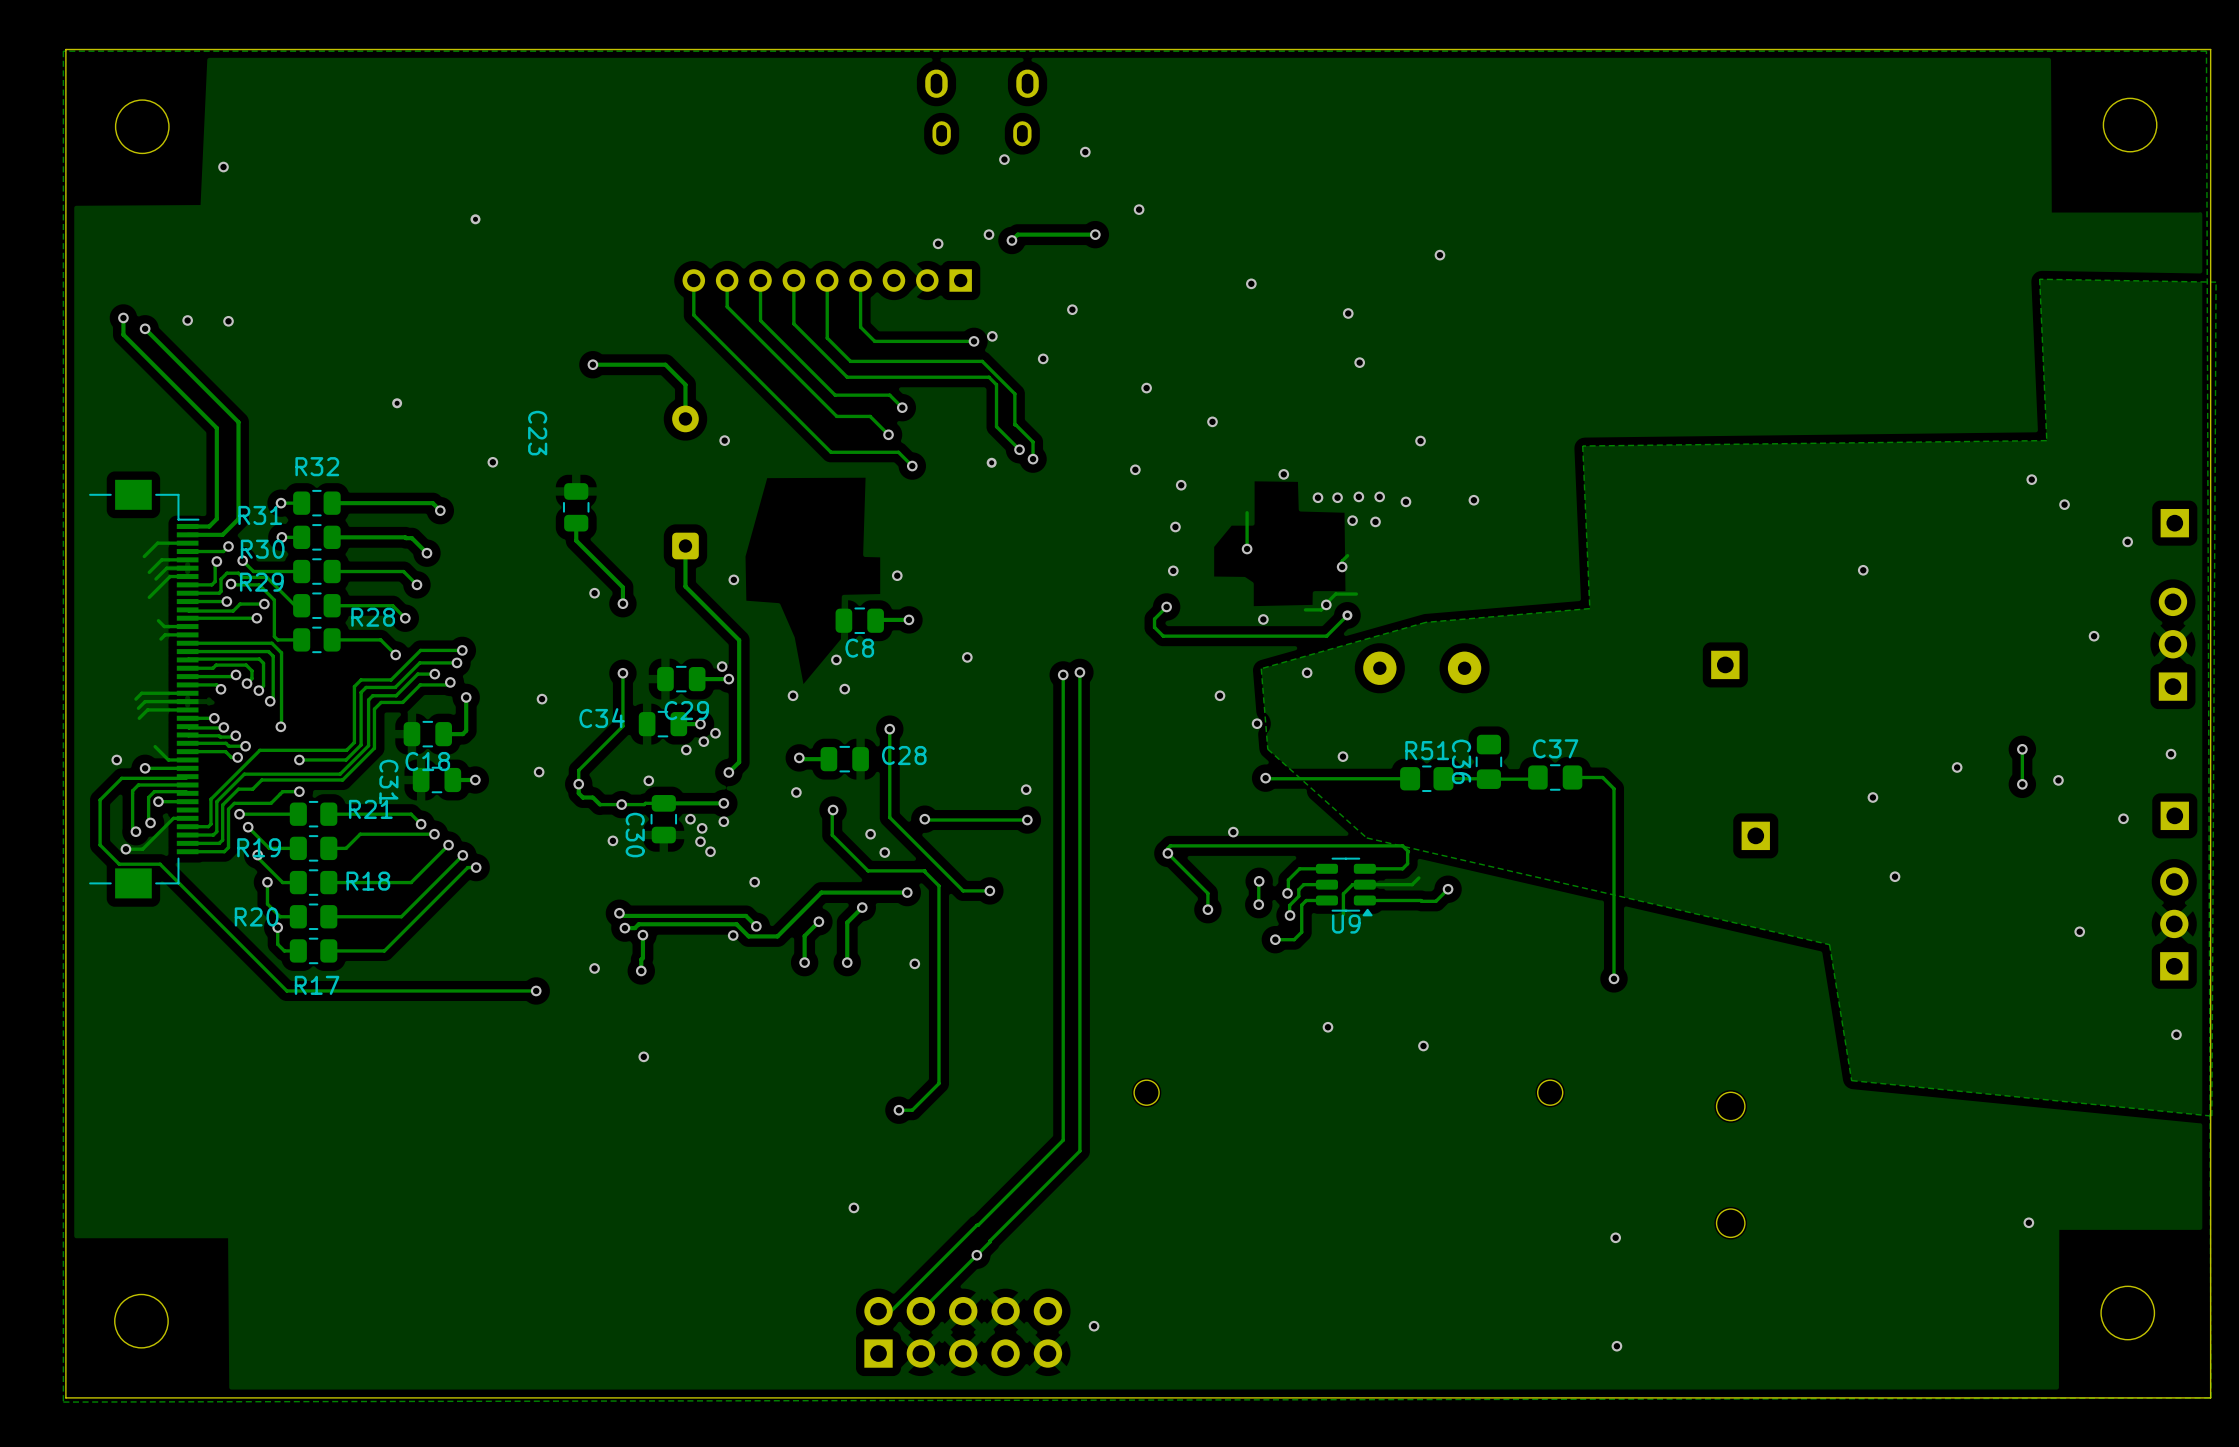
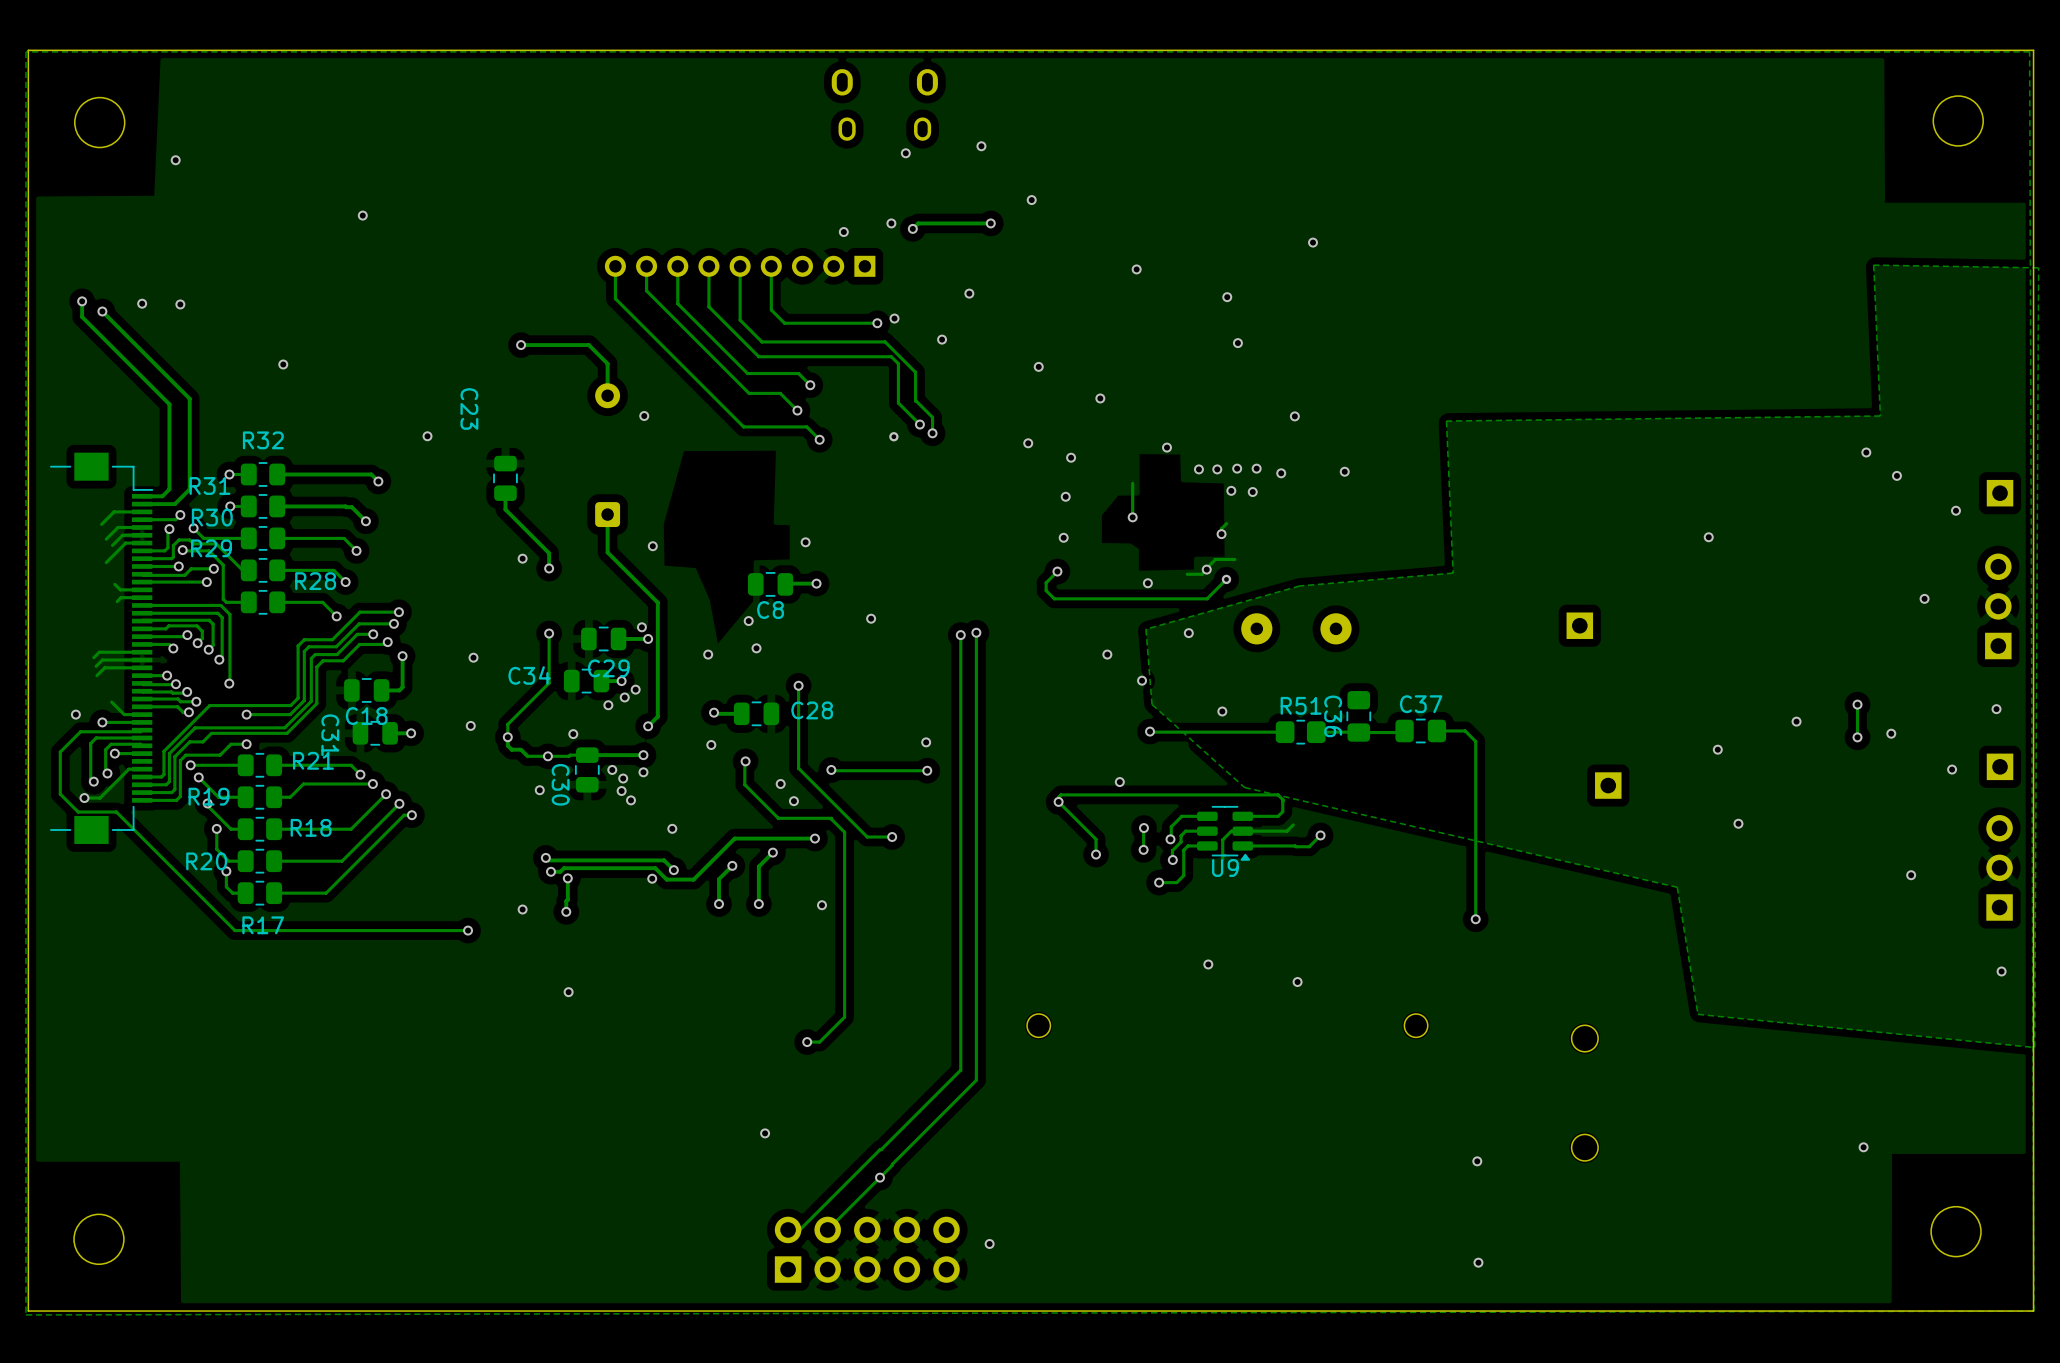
via: (475, 219) -> none
via: none -> (362, 215)
via: none -> (283, 364)
via: (397, 403) -> none

